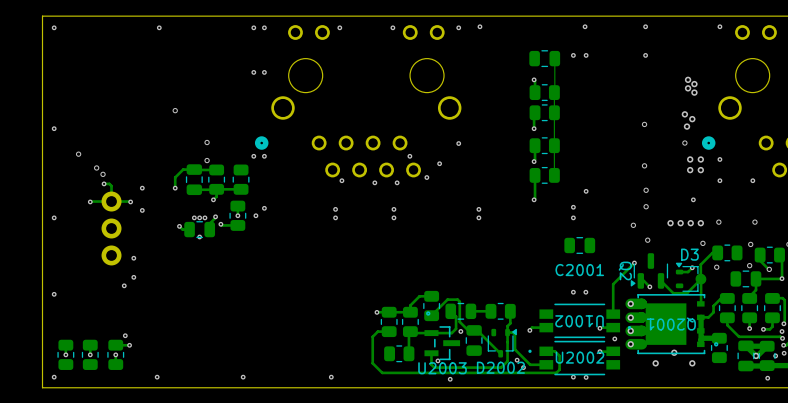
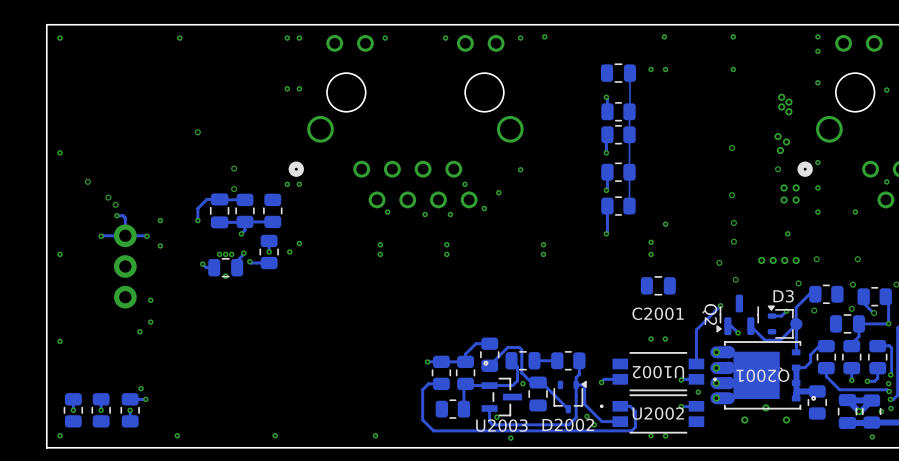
via: none -> (817, 51)
via: none -> (817, 82)
via: none -> (886, 90)
via: none -> (817, 162)
via: none -> (886, 181)

